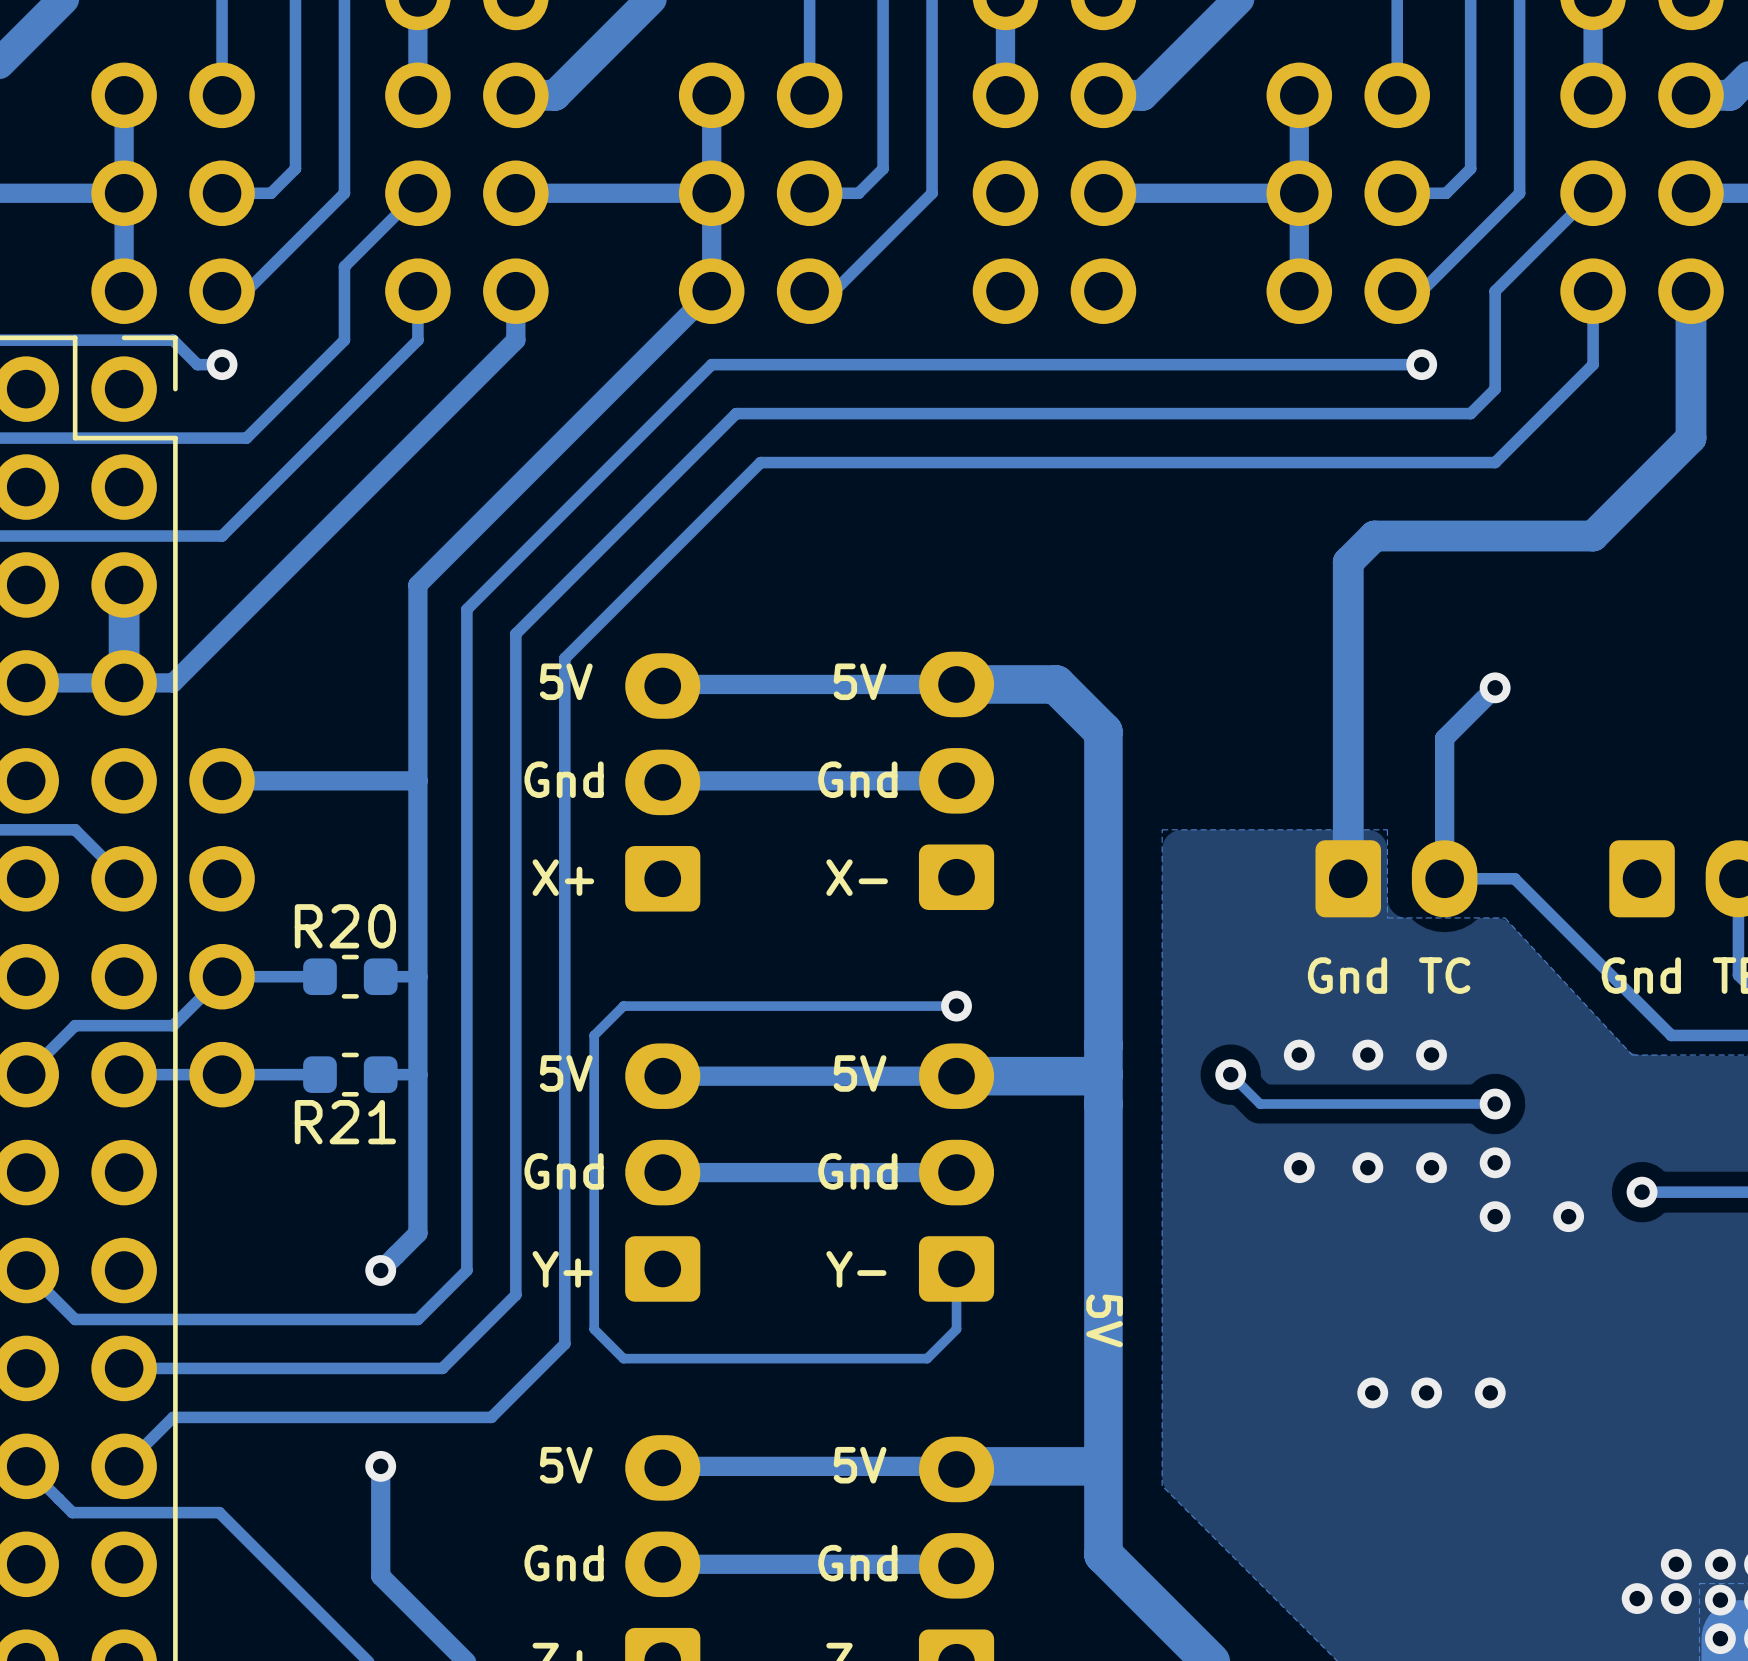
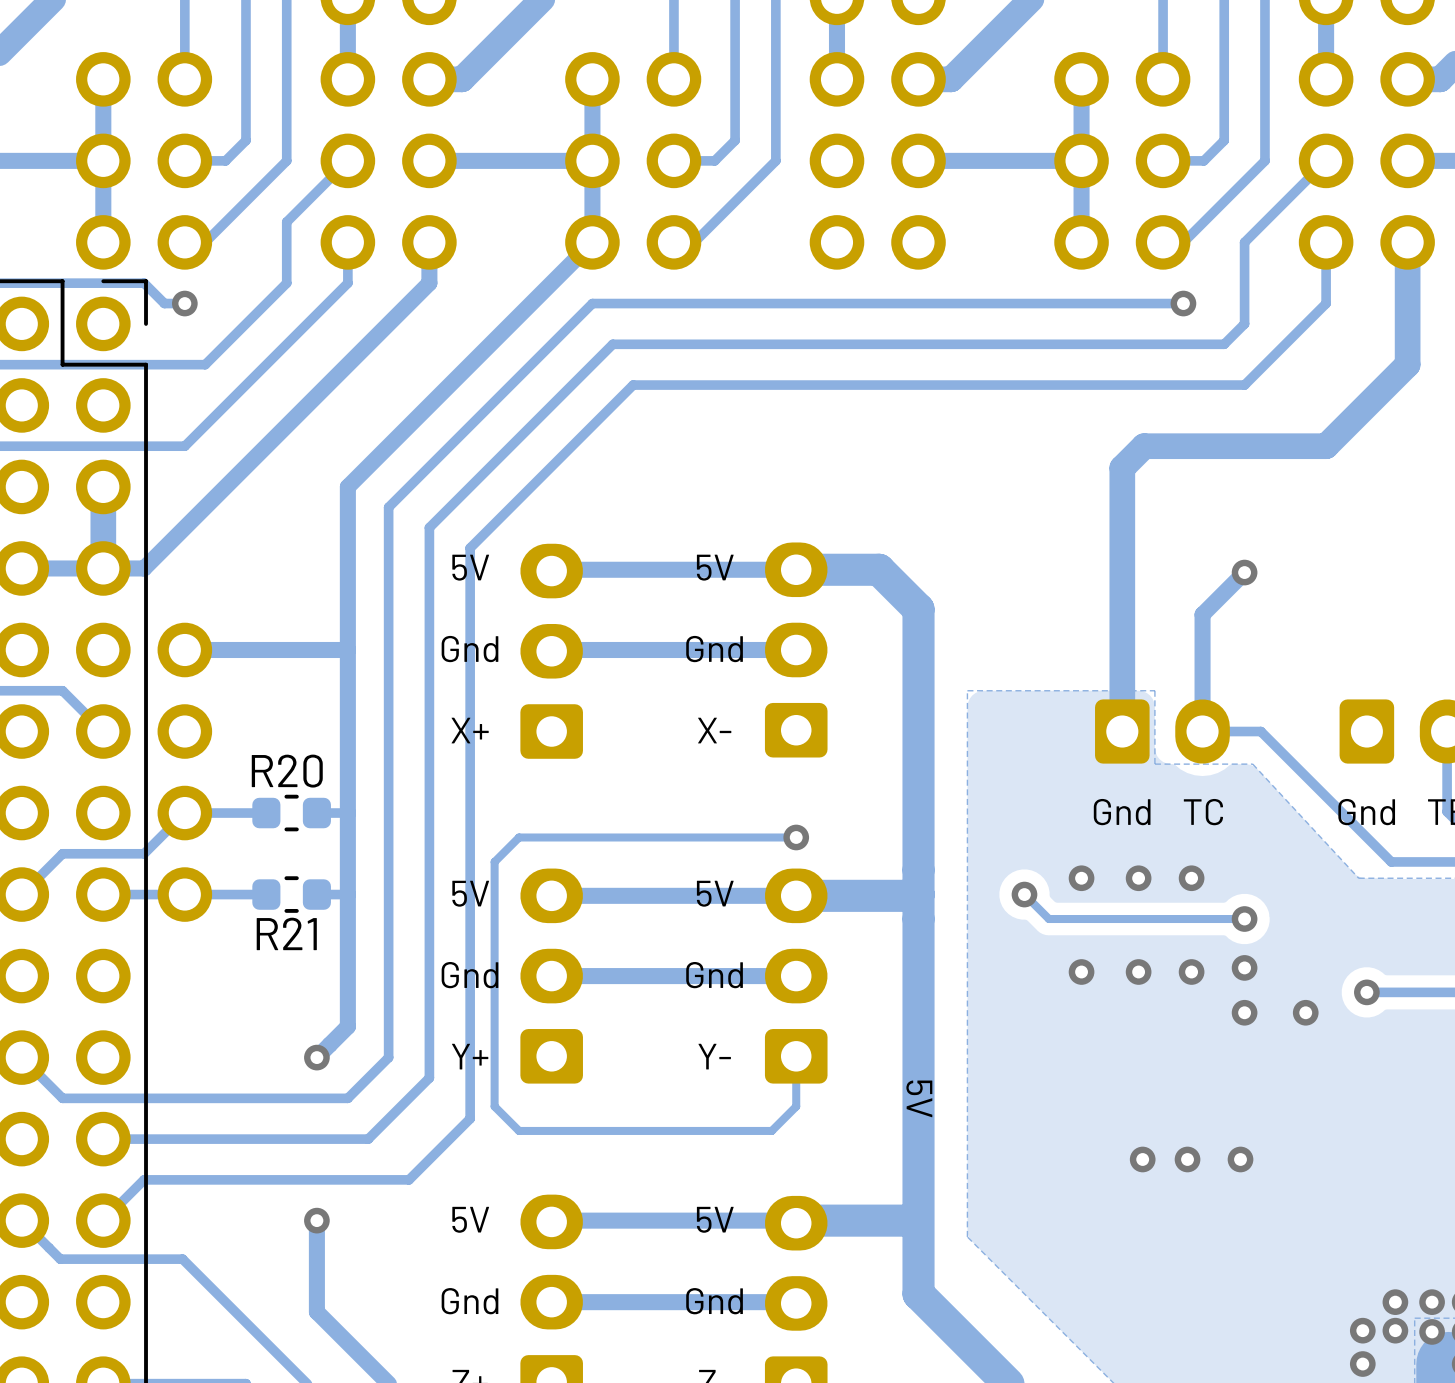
via: none -> (1362, 1364)
via: (1720, 1638) -> none

